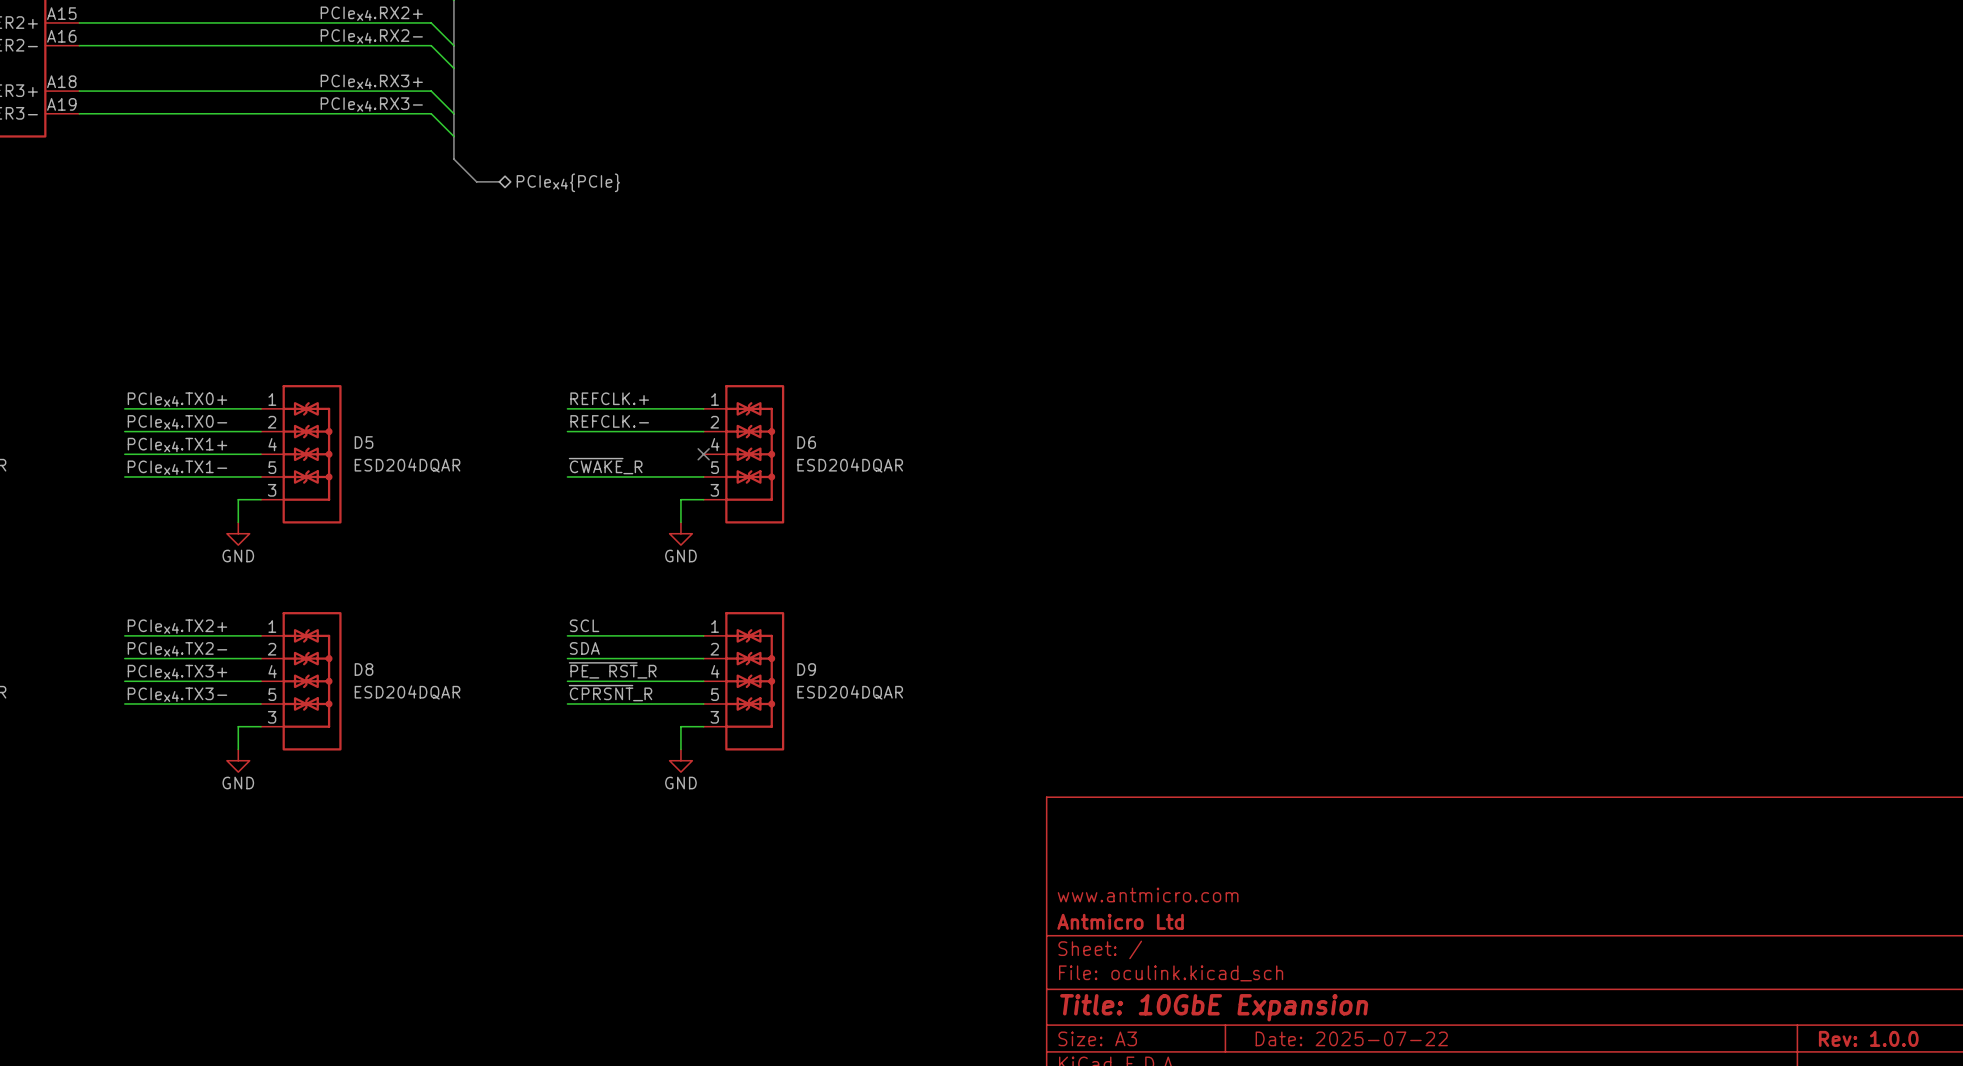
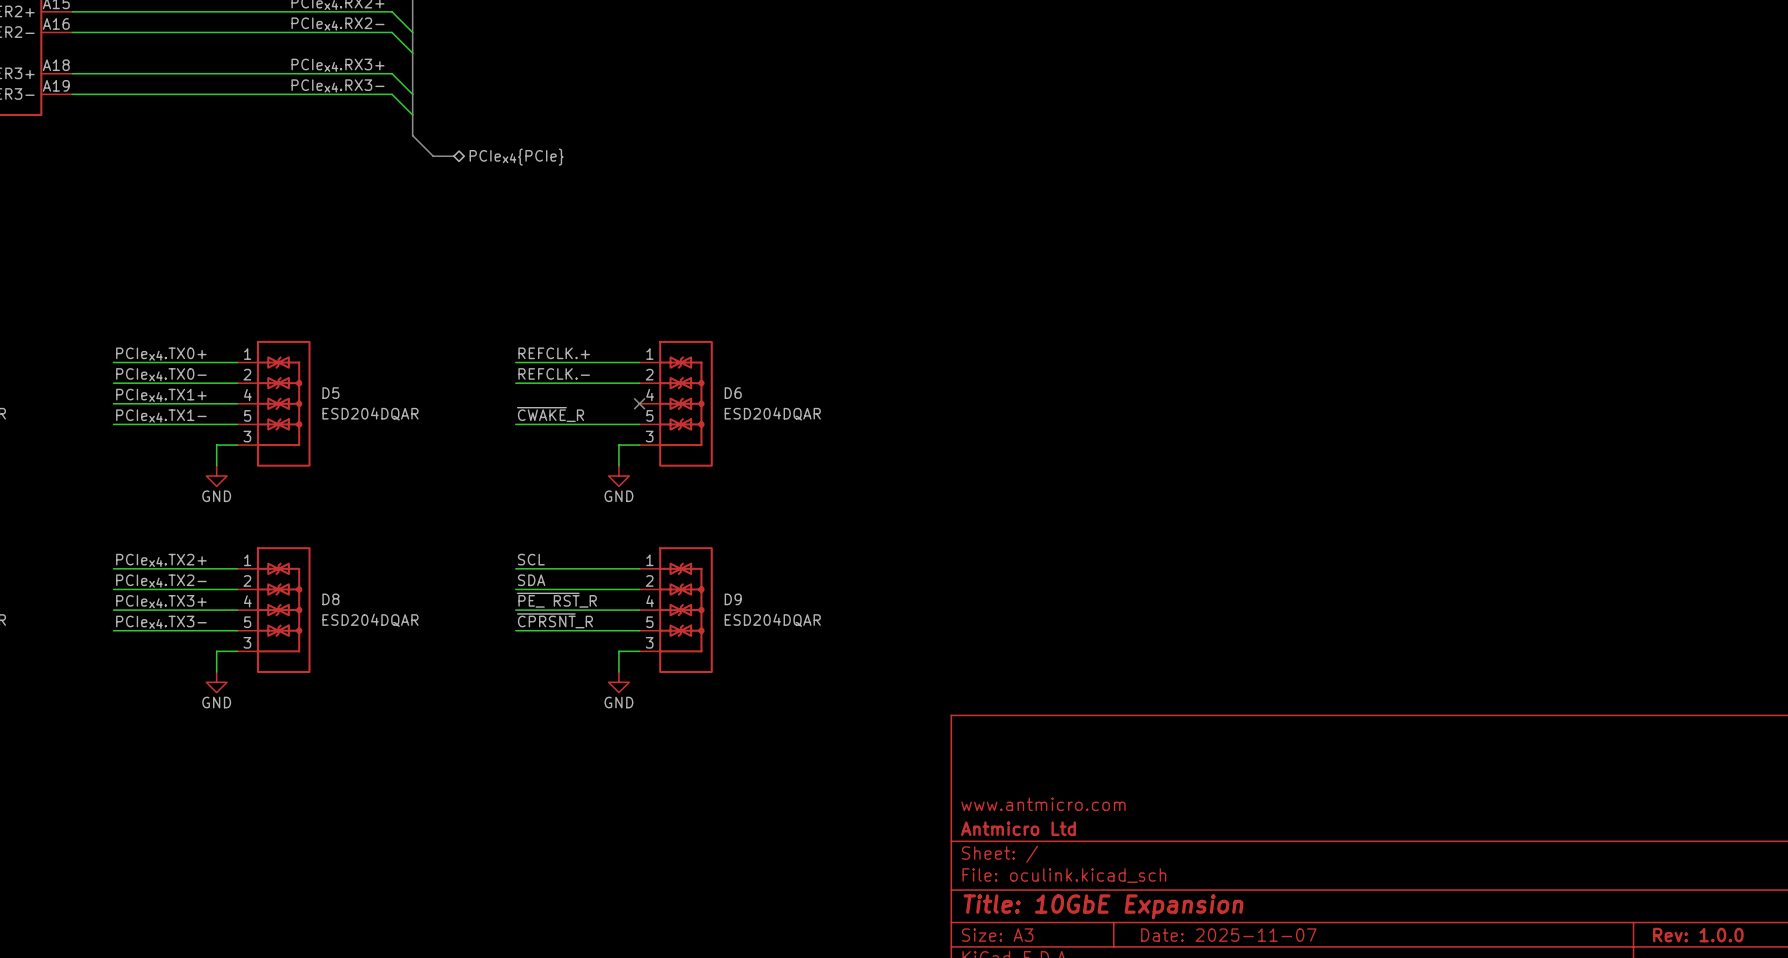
title block: Date: 2025-07-22 (1351, 1038) -> Date: 2025-11-07 (1228, 935)

